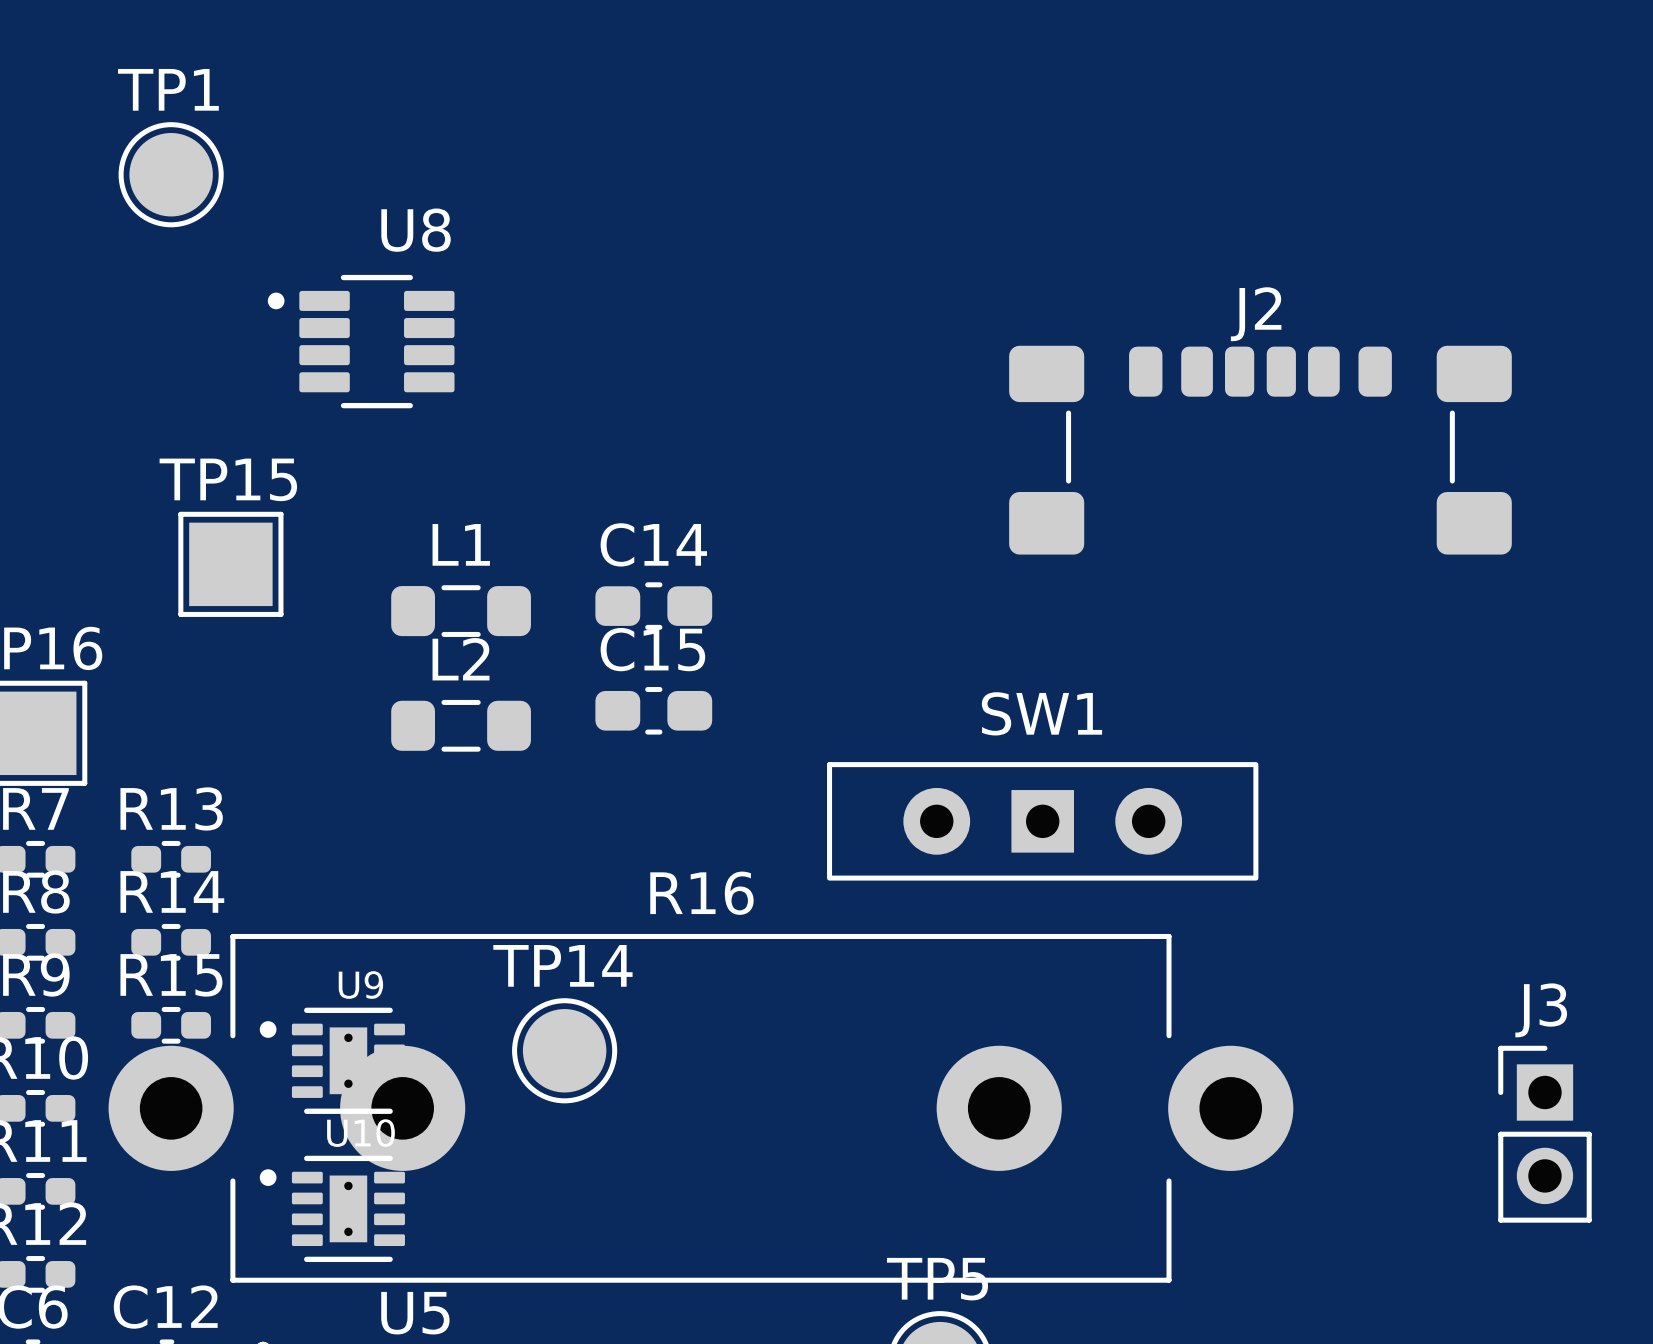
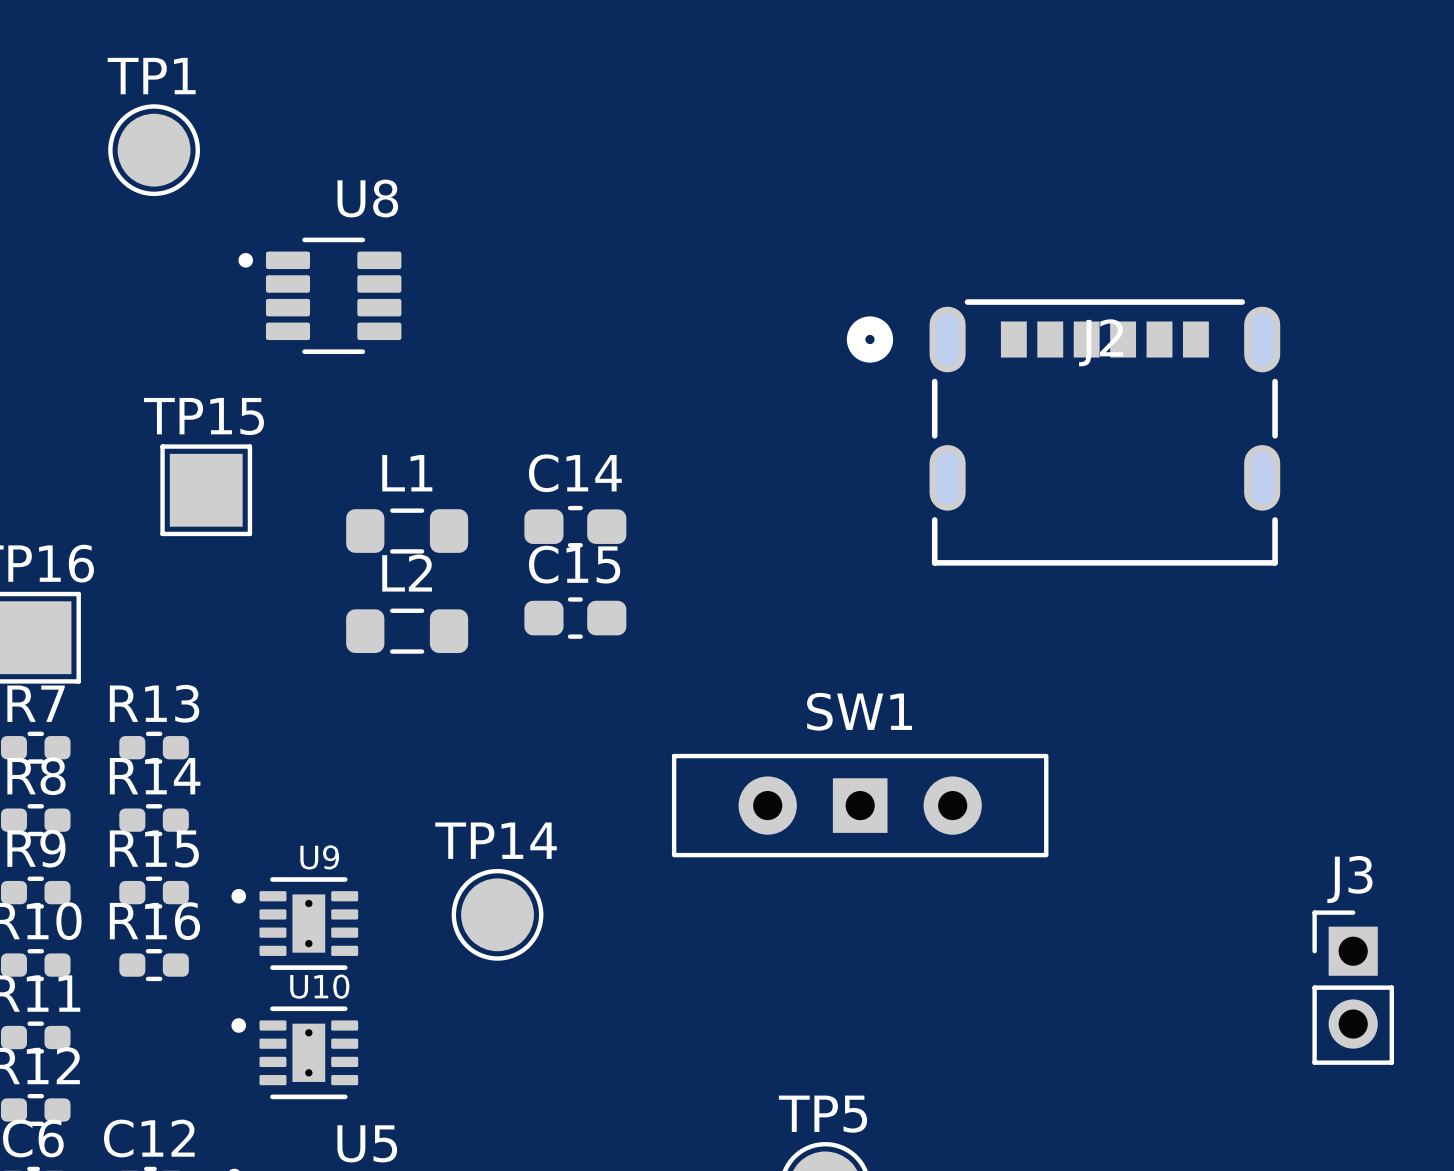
J2 footprint: [1009, 345, 1512, 555] -> [846, 299, 1281, 566]
SW1 position: (1042, 821) -> (860, 805)
R16 name position: R16 (701, 893) -> R16 (154, 921)
R16 footprint: [108, 933, 1294, 1283] -> [119, 949, 189, 982]

